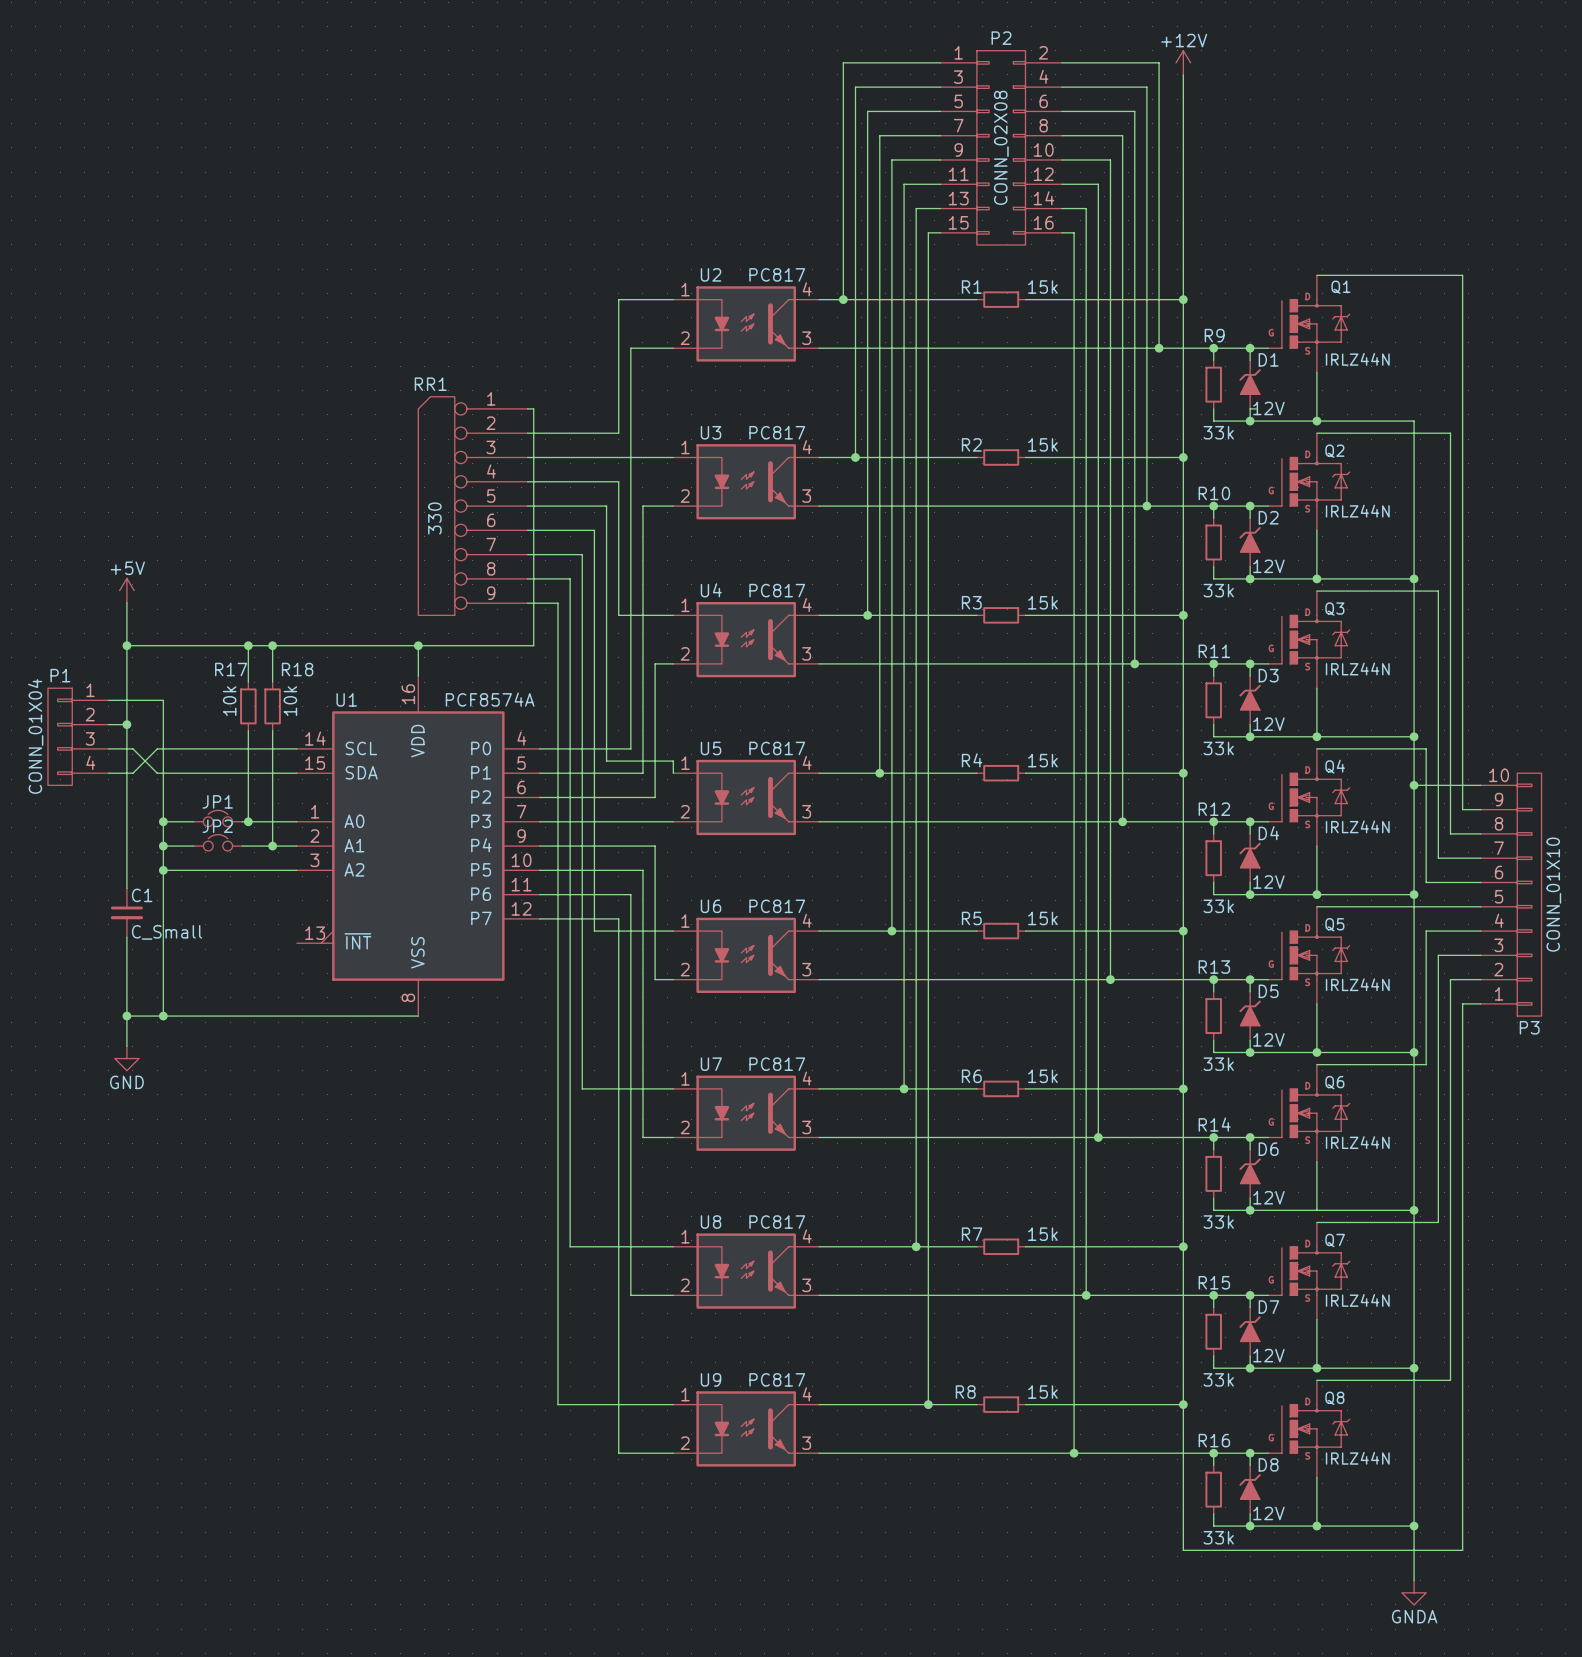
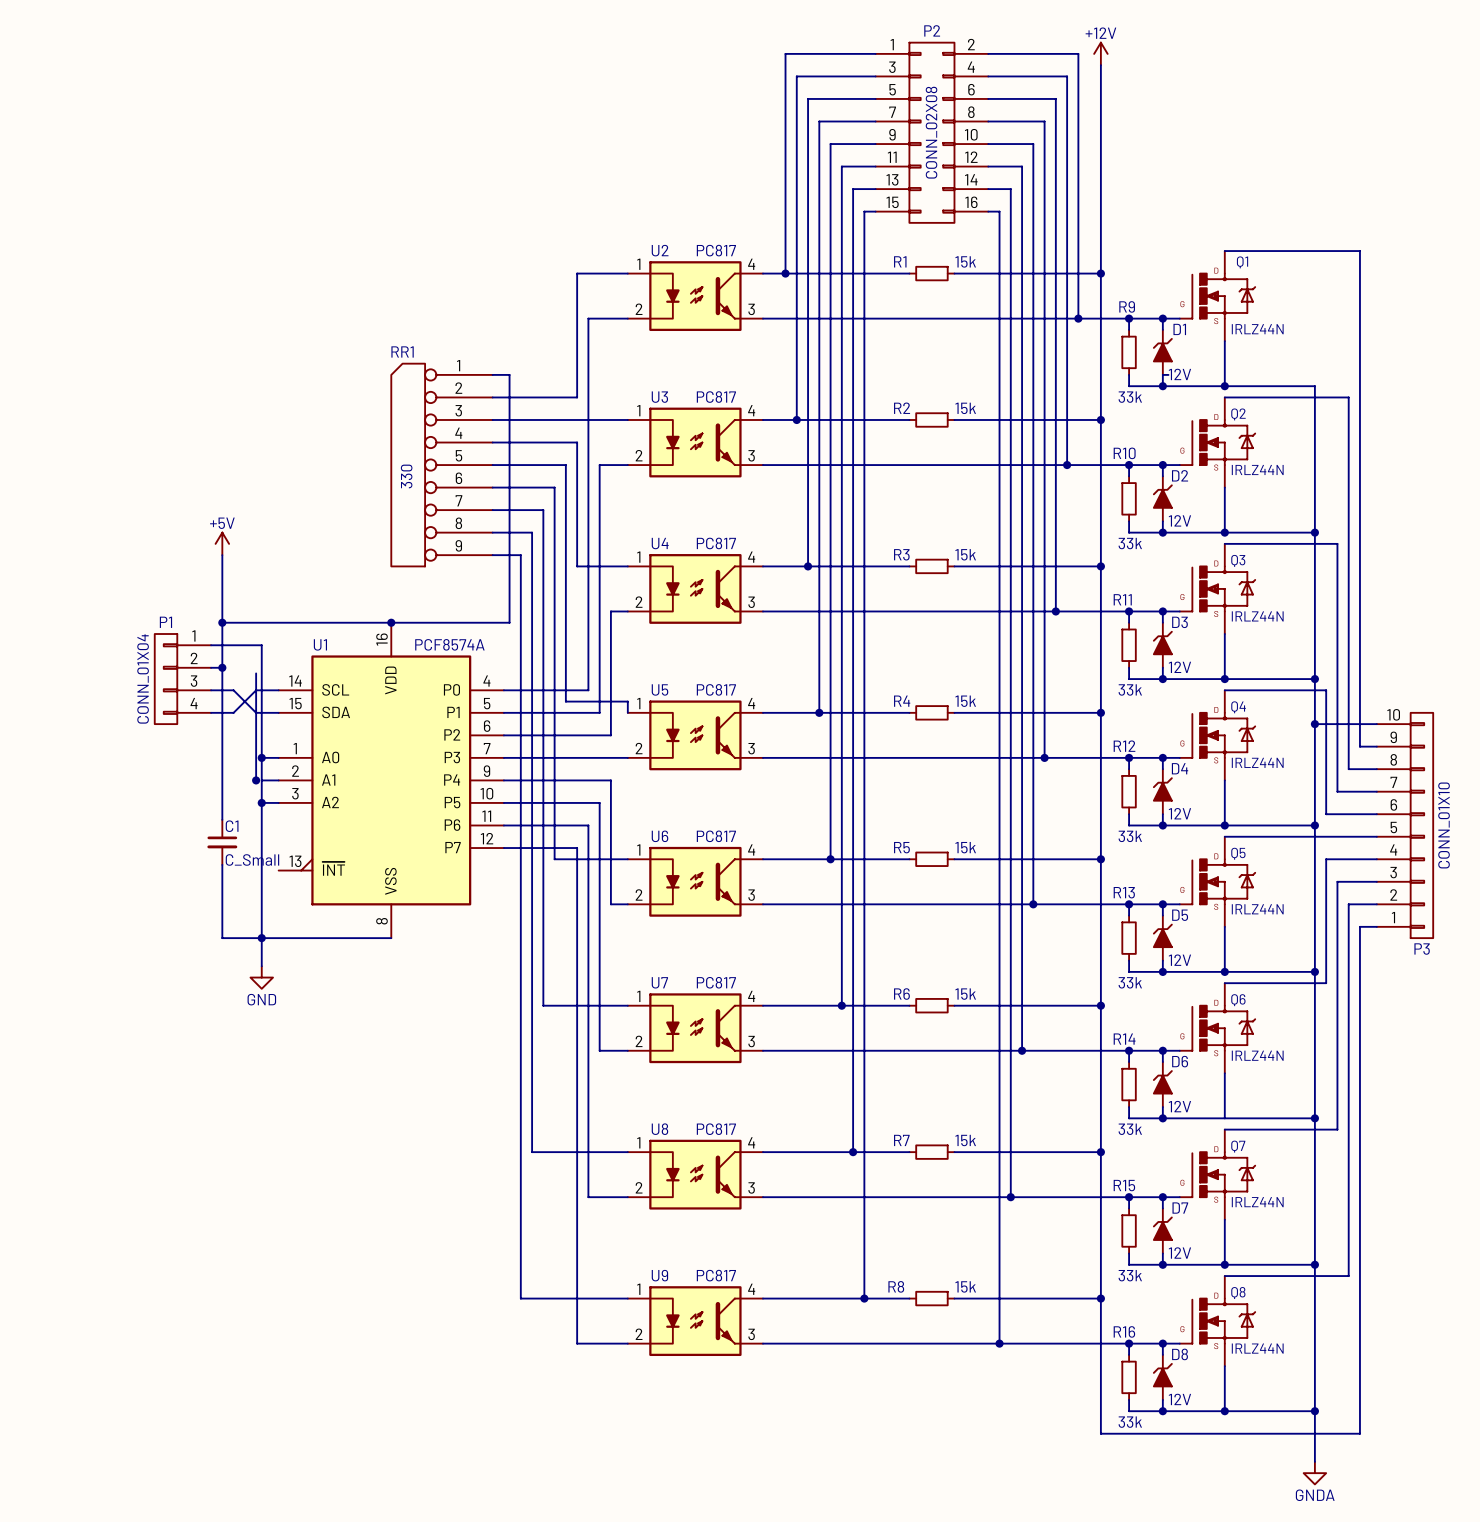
wire: (533, 408) (533, 645) (126, 645) -> (498, 374) (509, 374) (509, 622) (222, 622)
power symbol position: +5V (126, 590) -> +5V (222, 543)
wire: (126, 602) (126, 888) -> none
wire: none -> (222, 555) (222, 819)
junction: (126, 645) -> none
wire: (248, 645) (248, 682) -> none
junction: (248, 645) -> none
wire: (272, 645) (272, 682) -> none
junction: (272, 645) -> none
wire: (418, 645) (418, 676) -> none
junction position: (418, 645) -> (391, 622)
junction: none -> (222, 622)
wire: (108, 700) (163, 700) (163, 1016) -> none
wire: none -> (211, 645) (261, 645) (261, 966)
R17: 10k (248, 706) -> none
R18: 10k (272, 706) -> none
wire: (108, 724) (126, 724) -> none
junction: (126, 724) -> none
wire: none -> (211, 667) (222, 667)
junction: none -> (222, 667)
wire: (248, 730) (248, 821) -> none
P1 position: (78, 736) -> (182, 679)
wire: (108, 748) (132, 748) (157, 773) (224, 773) -> none
wire: (224, 748) (157, 748) (132, 773) (108, 773) -> none
wire: (248, 748) (272, 748) -> (233, 690) (256, 712)
wire: (248, 773) (272, 773) -> (233, 712) (256, 690)
JP1: (217, 818) -> none
wire: (163, 821) (193, 821) -> none
junction: (163, 821) -> none
wire: (242, 821) (278, 821) -> none
junction: (248, 821) -> none
junction: none -> (261, 757)
JP2: (217, 842) -> none
wire: (163, 846) (193, 846) -> none
junction: (163, 846) -> none
wire: (242, 846) (278, 846) -> none
wire: (163, 870) (278, 870) -> none
junction: (163, 870) -> none
junction: none -> (261, 802)
C1 position: (126, 912) -> (222, 842)
wire: (126, 937) (126, 1046) -> none
wire: (126, 1016) (236, 1016) -> (222, 864) (222, 938)
junction: (126, 1016) -> none
junction: (163, 1016) -> none
junction: none -> (261, 938)
power symbol position: GND (126, 1058) -> GND (261, 977)

